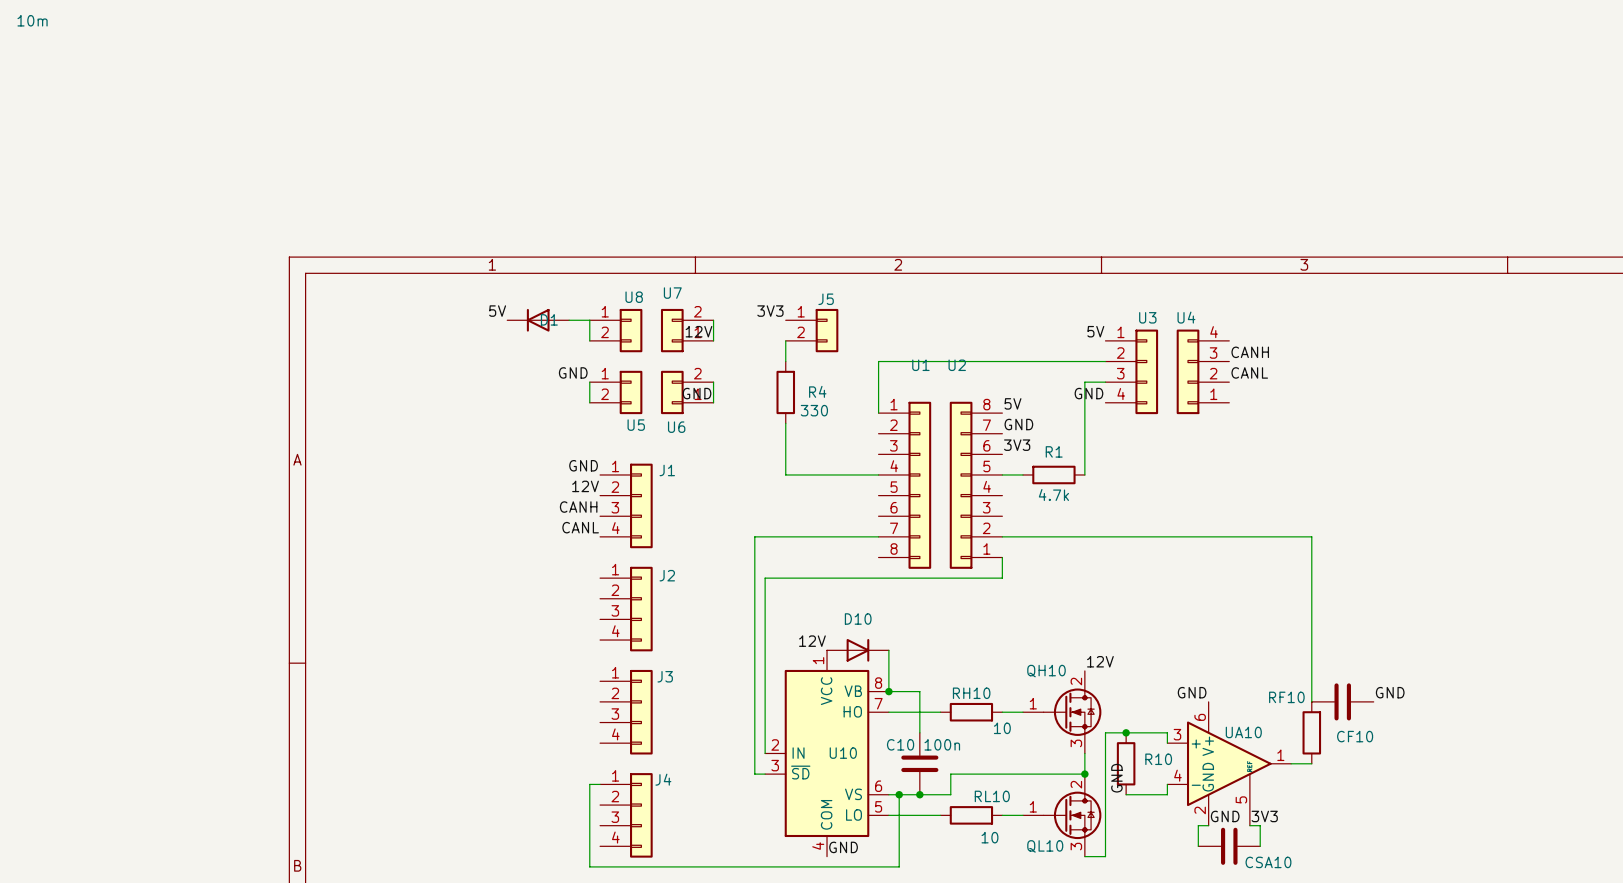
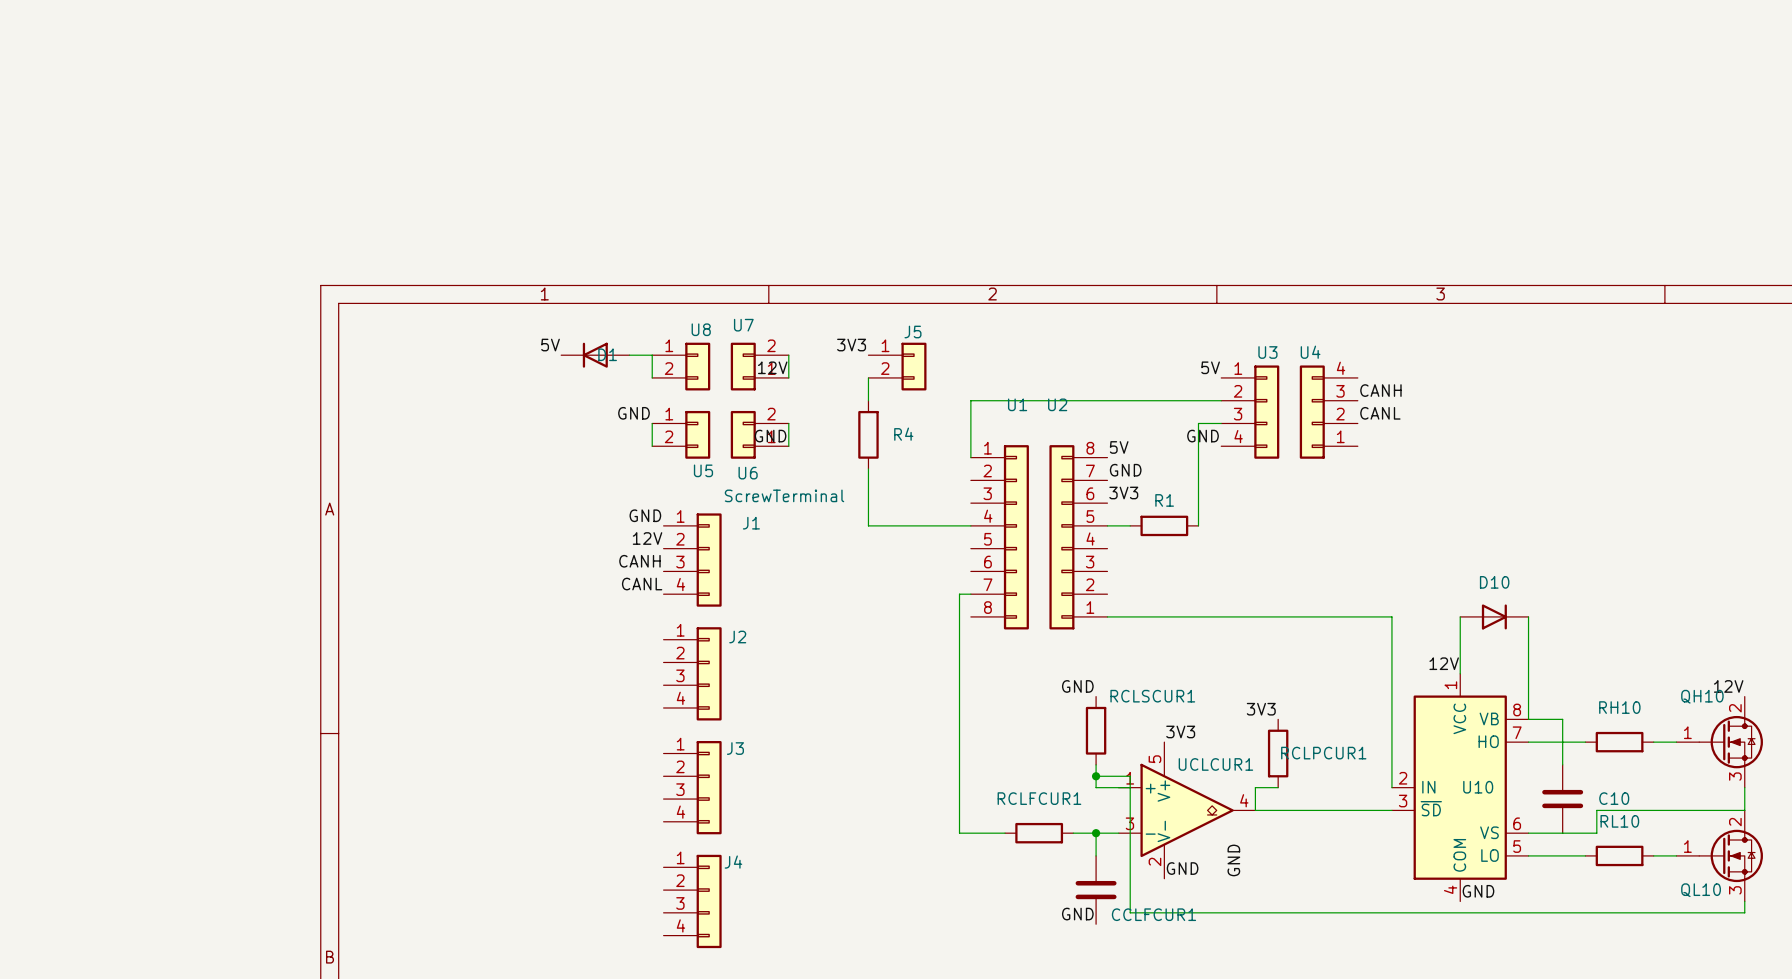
R4 value: 330 (814, 410) -> none
J1 value: none -> ScrewTerminal (784, 495)
J1 name position: J1 (667, 470) -> J1 (751, 523)
R1 value: 4.7k (1053, 494) -> none
wire: (868, 536) (754, 536) (754, 774) (765, 774) -> (959, 594) (959, 833) (1005, 833)
wire: (1002, 536) (1311, 536) (1311, 701) -> none
wire: (1002, 557) (1002, 578) (765, 578) (765, 753) -> (1107, 616) (1391, 616) (1391, 787)
wire: none -> (1460, 616) (1460, 673)
wire: none -> (1528, 616) (1528, 719) (1562, 719) (1562, 764)
label: none -> 12V (1444, 663)
label: none -> GND (1077, 686)
label: none -> 12V (1728, 686)
label: 12V (812, 641) -> none
label: none -> 3V3 (1261, 709)
D10 position: (857, 650) -> (1494, 616)
wire: (888, 650) (888, 691) (919, 691) (919, 732) -> none
RCLSCUR1: none -> (1096, 730)
label: none -> 3V3 (1180, 731)
label: 12V (1100, 661) -> none
wire: none -> (1528, 742) (1585, 742)
wire: none -> (1653, 742) (1676, 742)
RCLPCUR1: none -> (1278, 753)
junction: (888, 691) -> none
label: GND (1192, 692) -> none
label: GND (1390, 692) -> none
RH10 name position: RH10 (971, 693) -> RH10 (1619, 707)
junction: none -> (1096, 776)
CF10: (1342, 701) -> none
wire: (888, 712) (940, 712) -> none
RH10 position: (971, 712) -> (1619, 742)
QH10 position: (1062, 712) -> (1719, 742)
wire: none -> (1744, 787) (1744, 810) (1596, 810) (1596, 833) (1528, 833)
RH10 value: 10 (1002, 728) -> none
UCLCUR1: none -> (1187, 810)
junction: (1126, 732) -> none
wire: (1136, 732) (1105, 732) (1105, 856) (1084, 856) -> (1255, 810) (1255, 787) (1278, 787)
wire: (1167, 732) (1167, 743) -> (1289, 810) (1391, 810)
RF10: (1311, 732) -> none
C10 name position: C10 (900, 744) -> C10 (1614, 798)
C10 value: 100n (942, 744) -> none
U10 position: (827, 753) -> (1460, 787)
RCLFCUR1: none -> (1039, 833)
wire: none -> (1073, 833) (1118, 833)
wire: none -> (1096, 833) (1096, 855)
junction: none -> (1096, 833)
wire: (1084, 753) (1084, 774) (950, 774) (950, 794) (888, 794) -> none
C10 position: (919, 763) -> (1562, 799)
R10: 10m (1126, 763) -> none
UA10: (1229, 763) -> none
junction: (1084, 774) -> none
wire: none -> (1528, 855) (1585, 855)
wire: none -> (1653, 855) (1676, 855)
wire: (600, 784) (589, 784) (589, 866) (899, 866) (899, 794) -> none
wire: (1167, 784) (1167, 794) (1126, 794) -> none
label: none -> GND (1182, 868)
junction: (899, 794) -> none
junction: (919, 794) -> none
RL10 name position: RL10 (992, 796) -> RL10 (1619, 821)
CCLFCUR1: none -> (1096, 890)
label: none -> GND (1478, 891)
wire: (888, 815) (940, 815) -> none
RL10 position: (971, 815) -> (1619, 855)
wire: (1002, 815) (1022, 815) -> none
QL10 position: (1062, 815) -> (1719, 855)
label: GND (1225, 816) -> none
label: 3V3 (1264, 816) -> none
wire: (1198, 825) (1198, 846) -> (1323, 912) (1130, 912) (1130, 776) (1096, 776)
wire: none -> (1335, 912) (1380, 912)
wire: (1260, 825) (1260, 846) -> (1391, 912) (1744, 912) (1744, 901)
label: none -> GND (1077, 914)
RL10 value: 10 (989, 837) -> none
CSA10: (1229, 846) -> none
label: GND (843, 847) -> none

